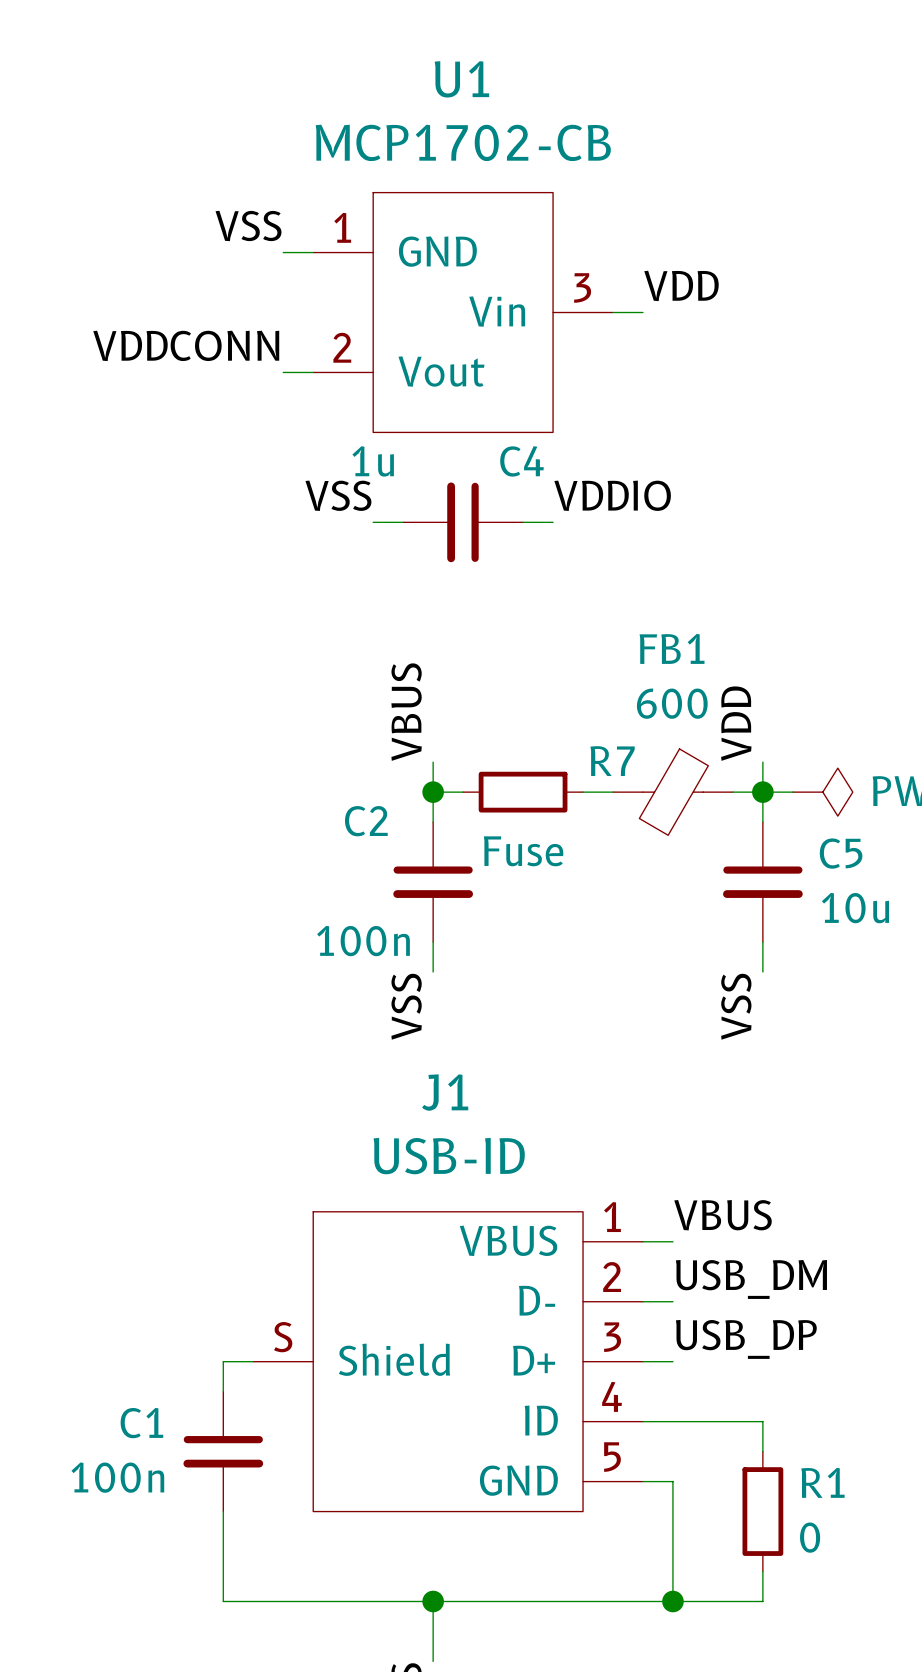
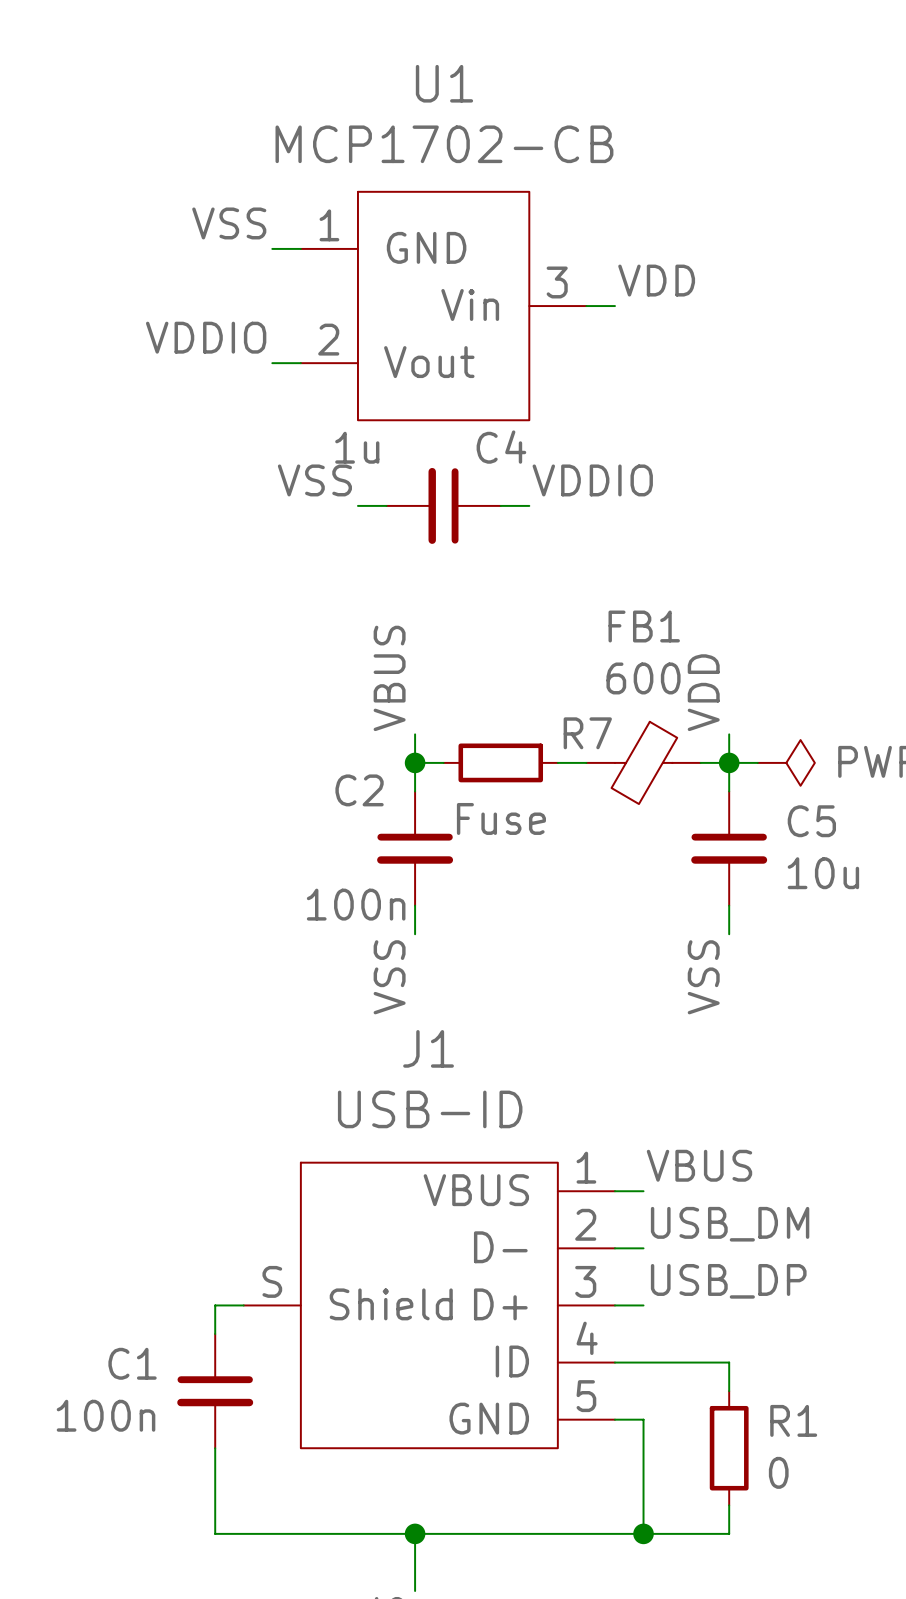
label: VDDCONN (186, 345) -> VDDIO (206, 337)

